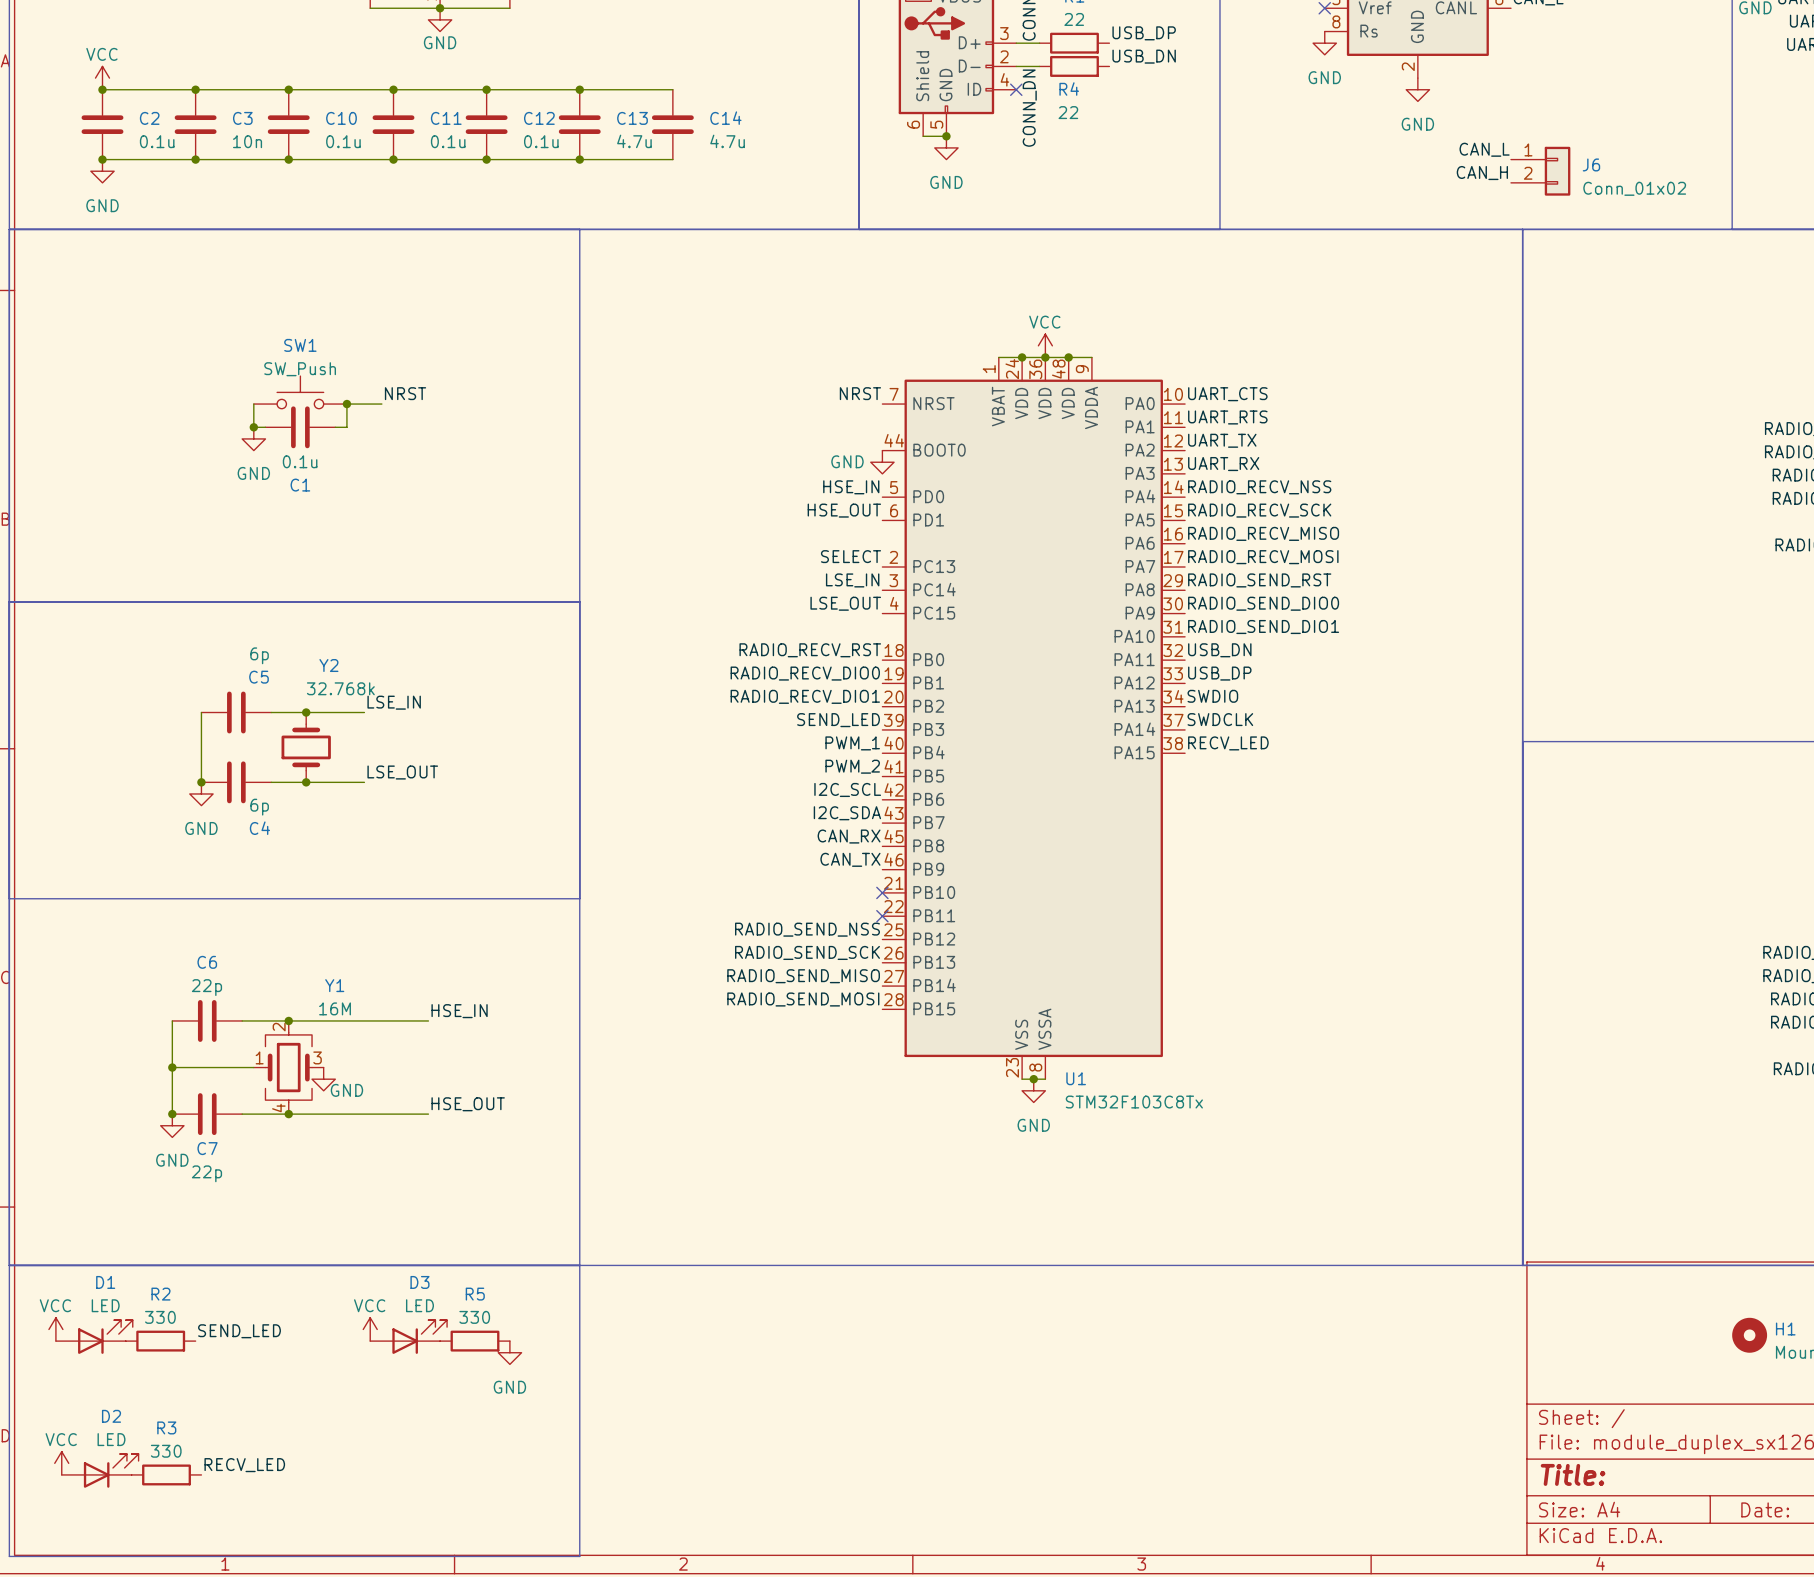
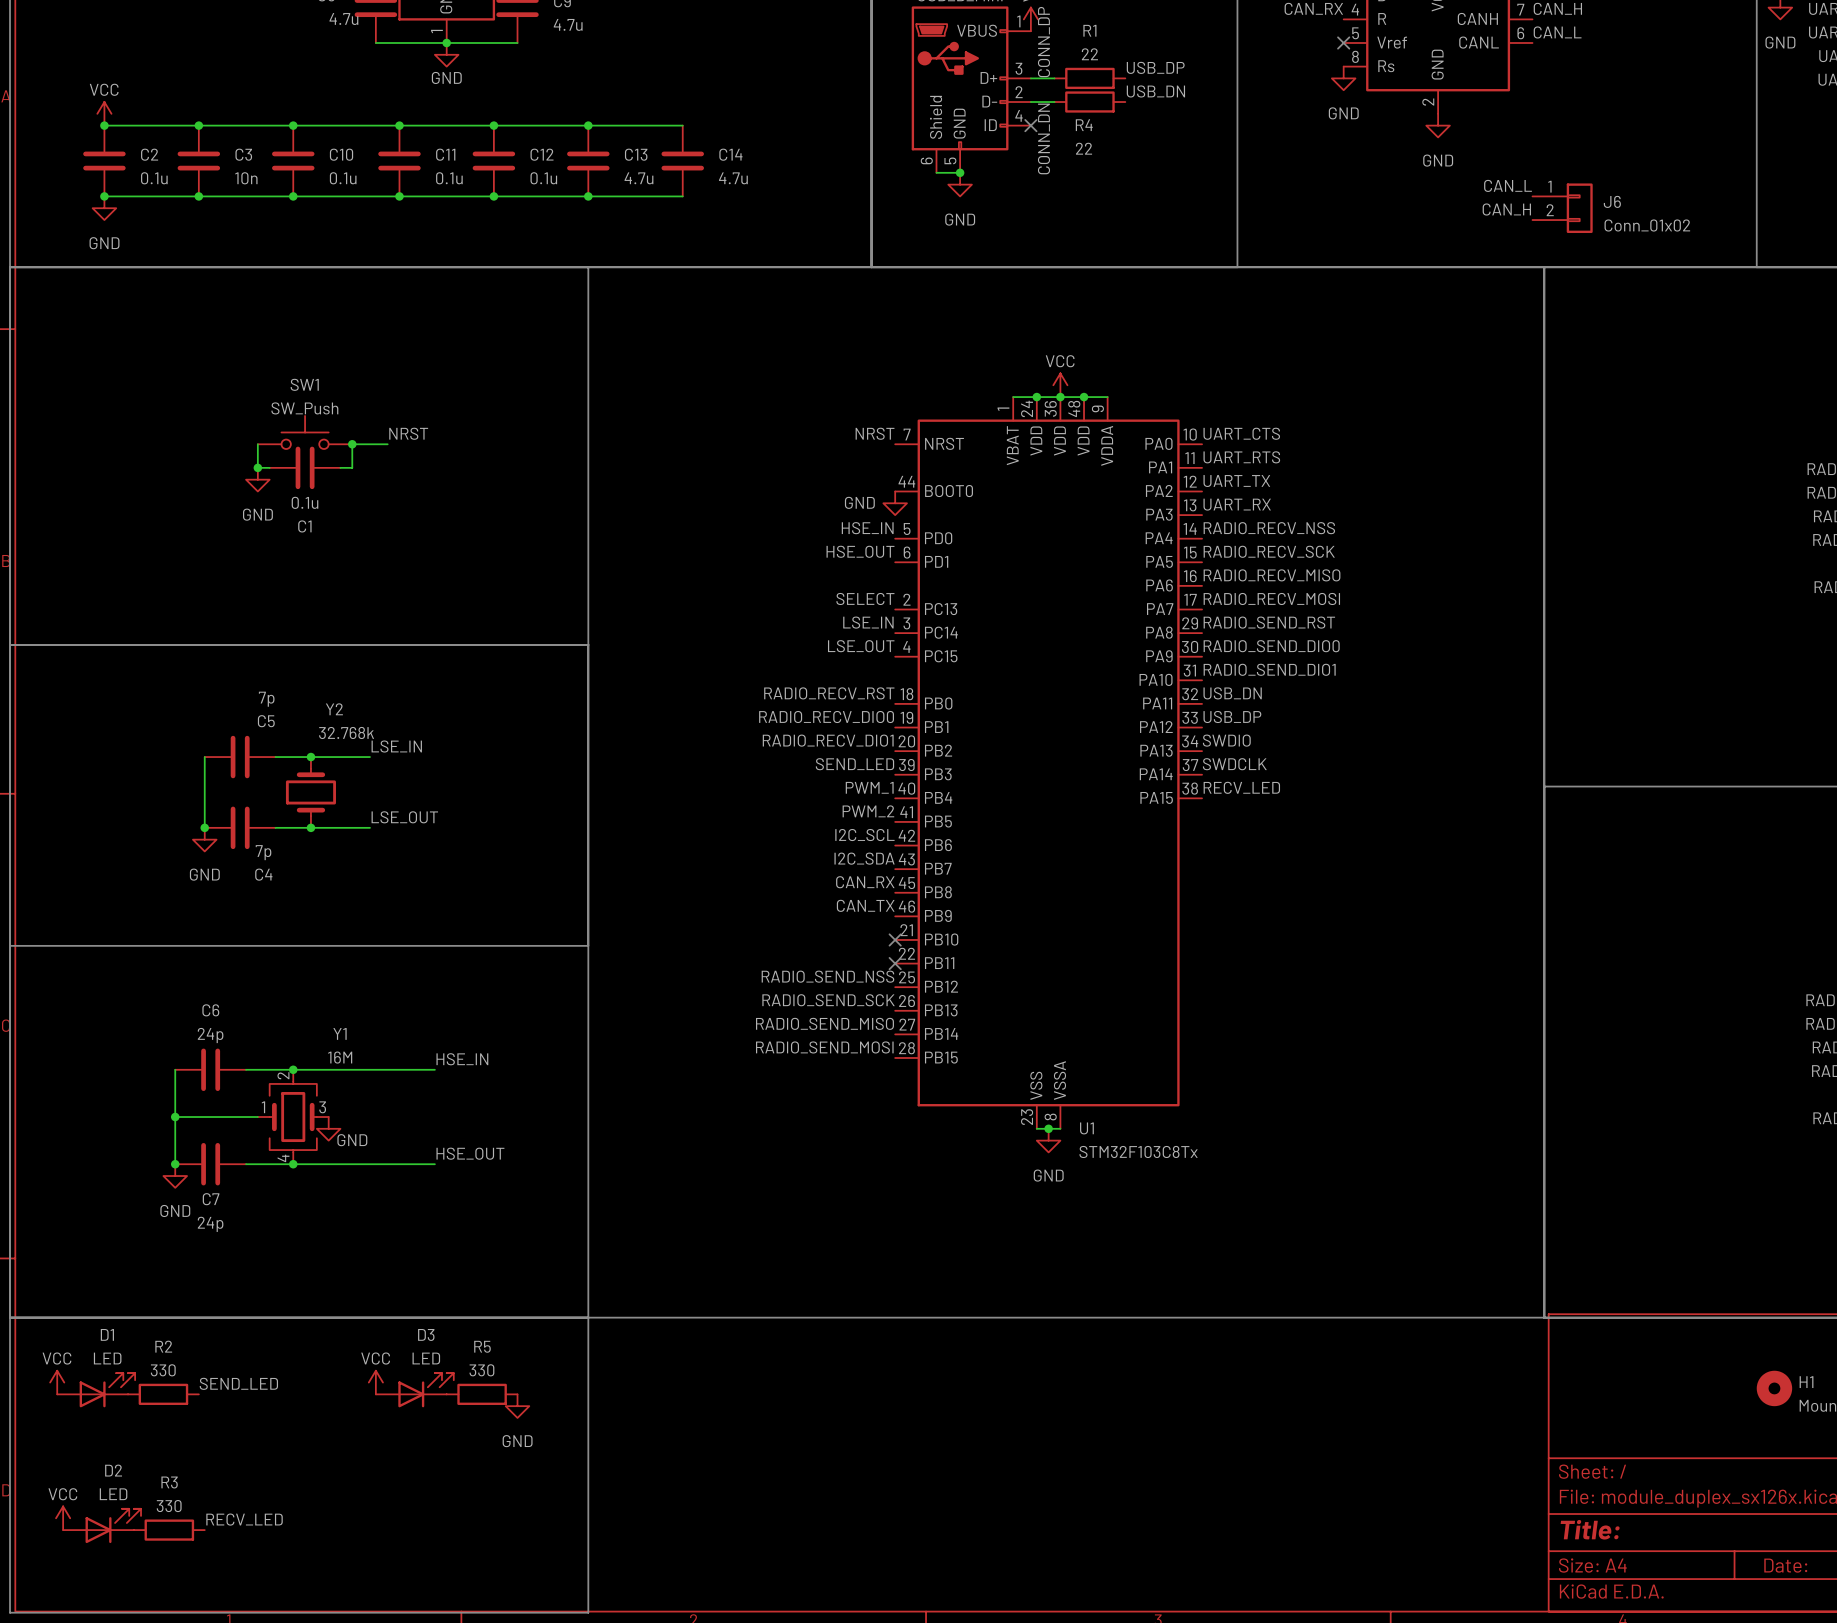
C5 value: 6p (259, 655) -> 7p (266, 699)
C4 value: 6p (259, 807) -> 7p (263, 852)
C6 value: 22p (206, 987) -> 24p (210, 1035)
C7 value: 22p (206, 1173) -> 24p (210, 1224)

